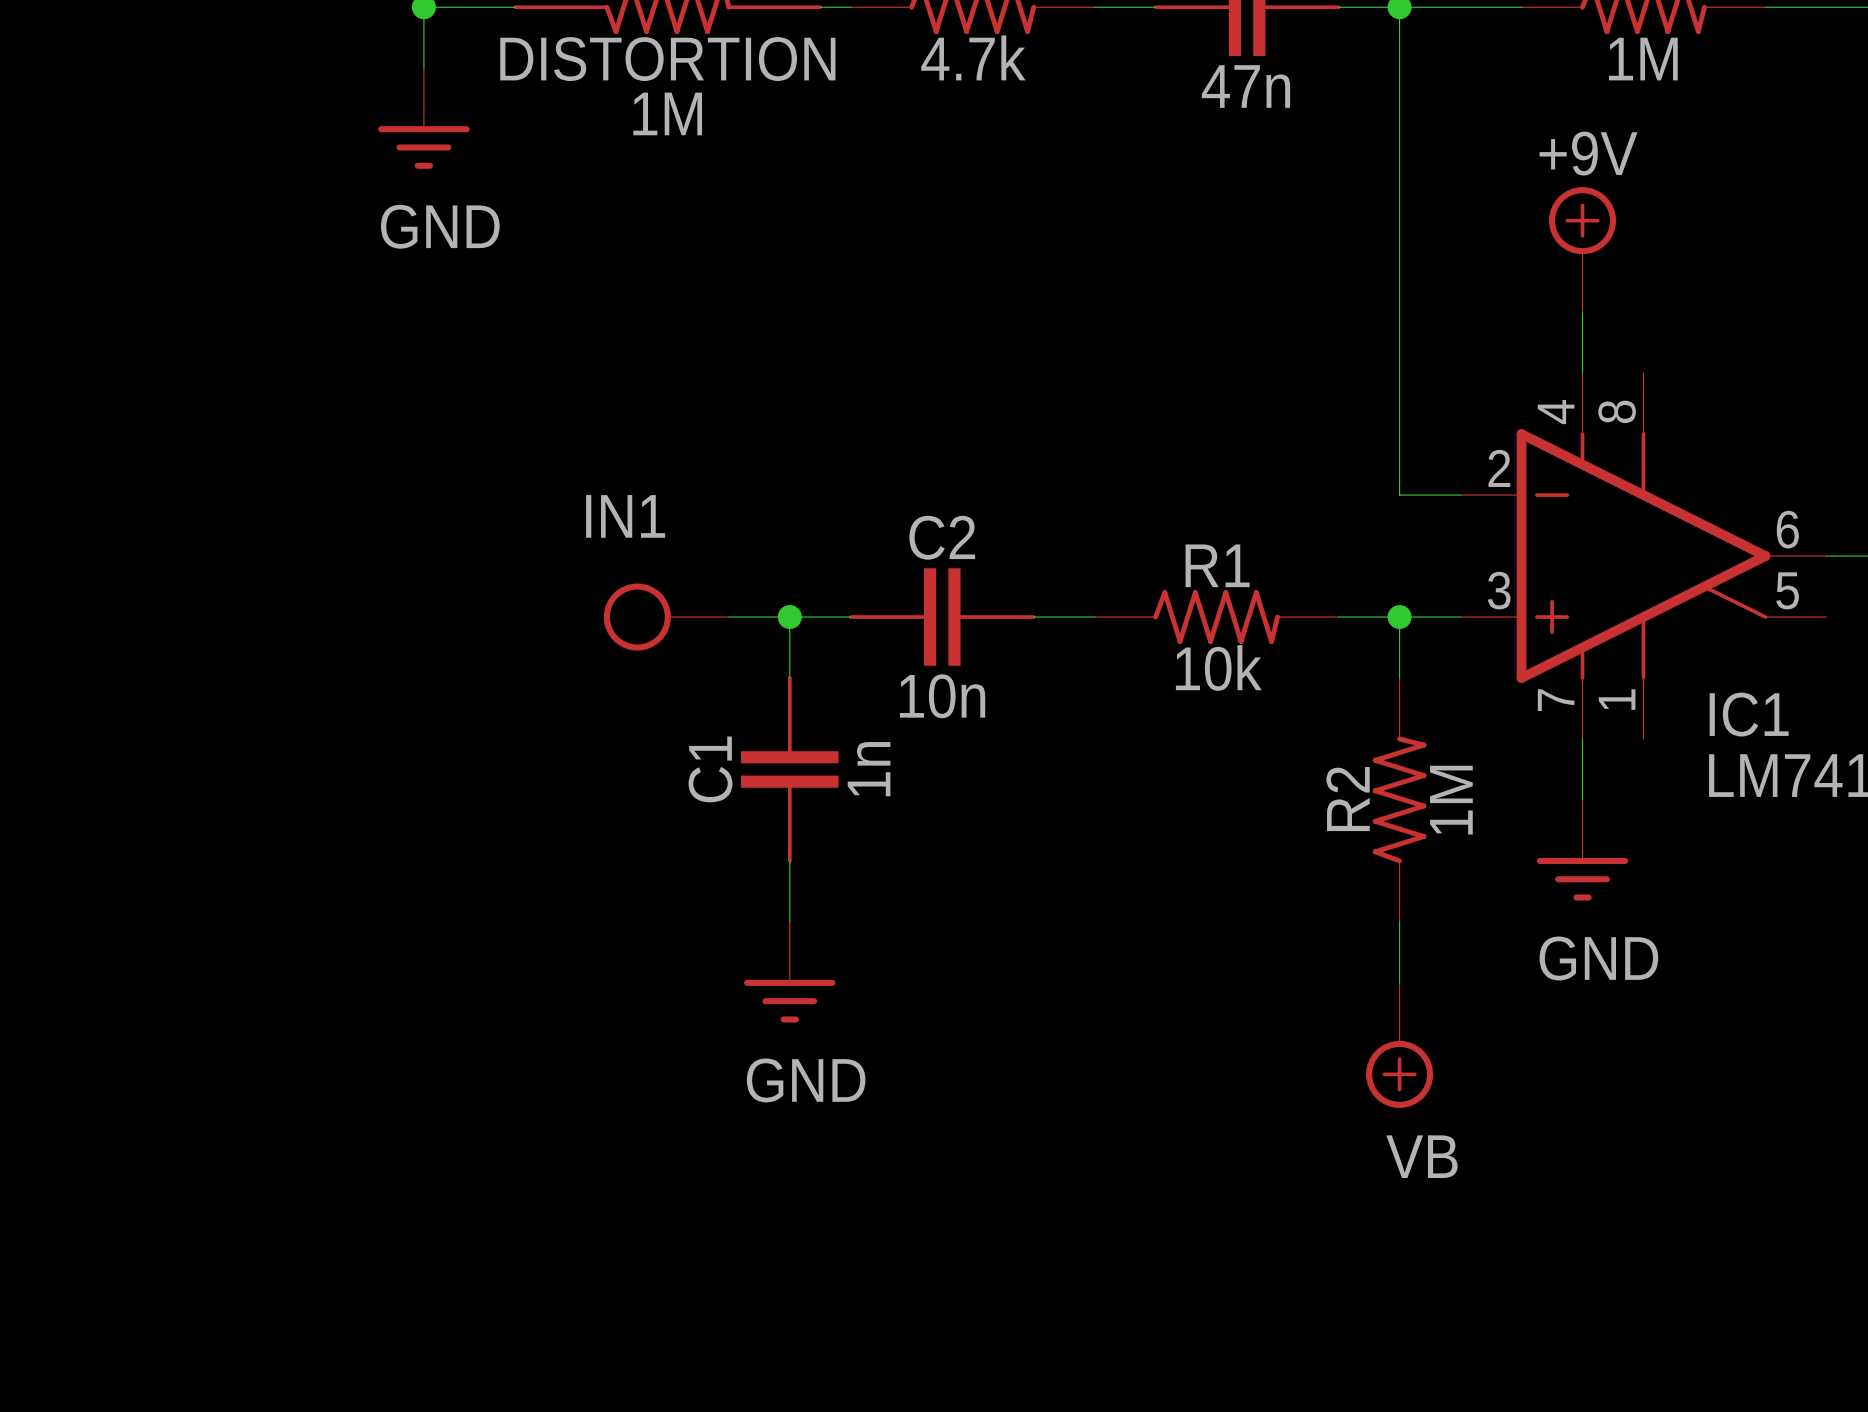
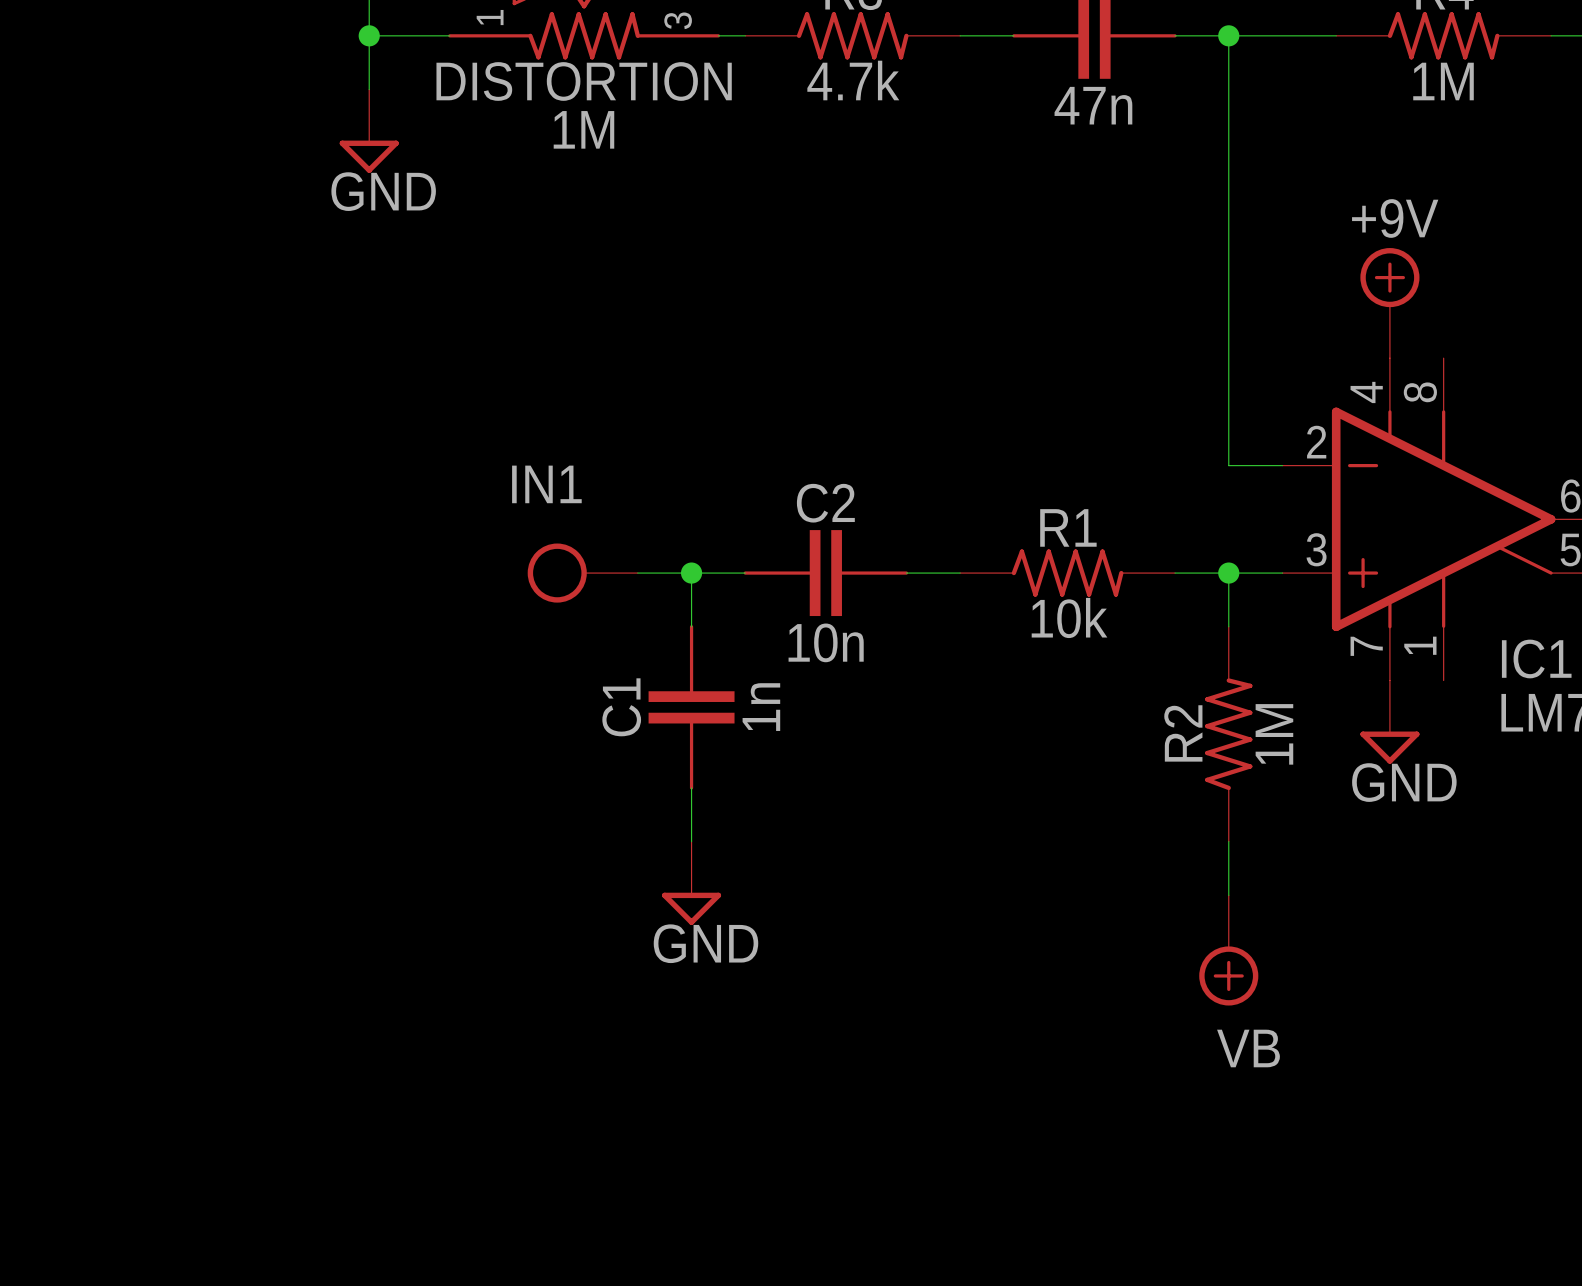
power symbol shape: [378, 68, 470, 169] -> [339, 89, 399, 173]
power symbol text position: GND (440, 226) -> GND (383, 191)
power symbol position: +9V (1582, 249) -> +9V (1389, 303)
power symbol: none -> GND (1389, 722)
power symbol: GND (1582, 850) -> none
power symbol shape: [744, 921, 836, 1023] -> [662, 841, 722, 925]
power symbol text position: GND (806, 1080) -> GND (705, 943)

